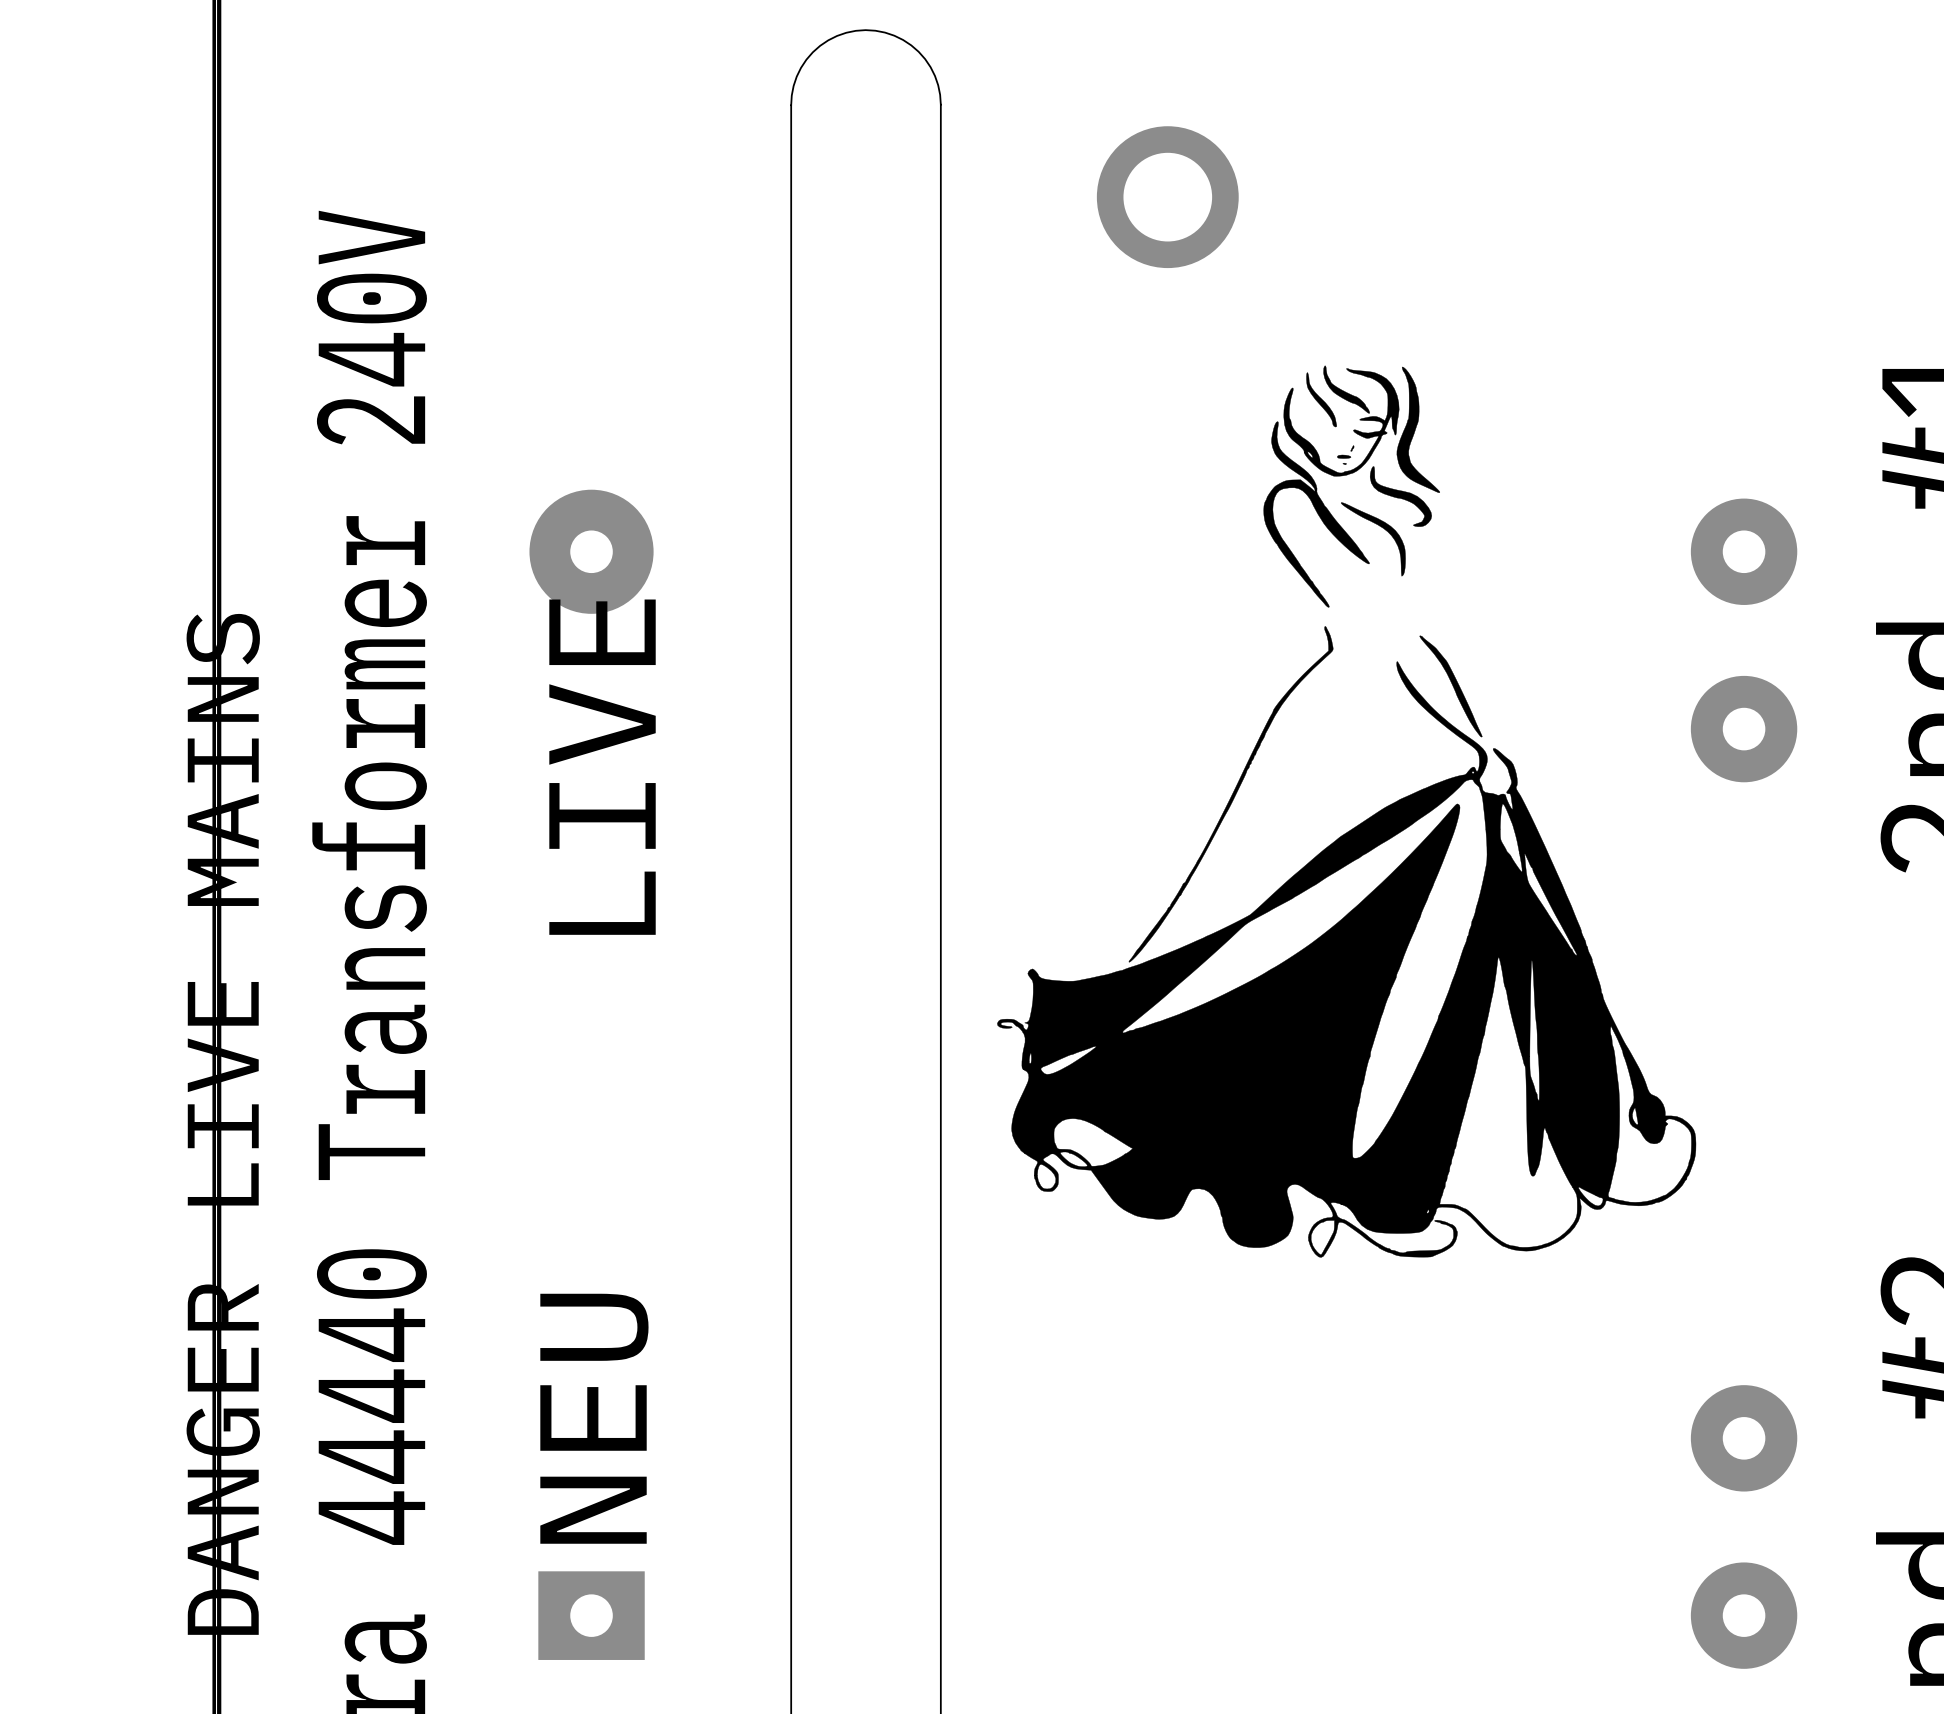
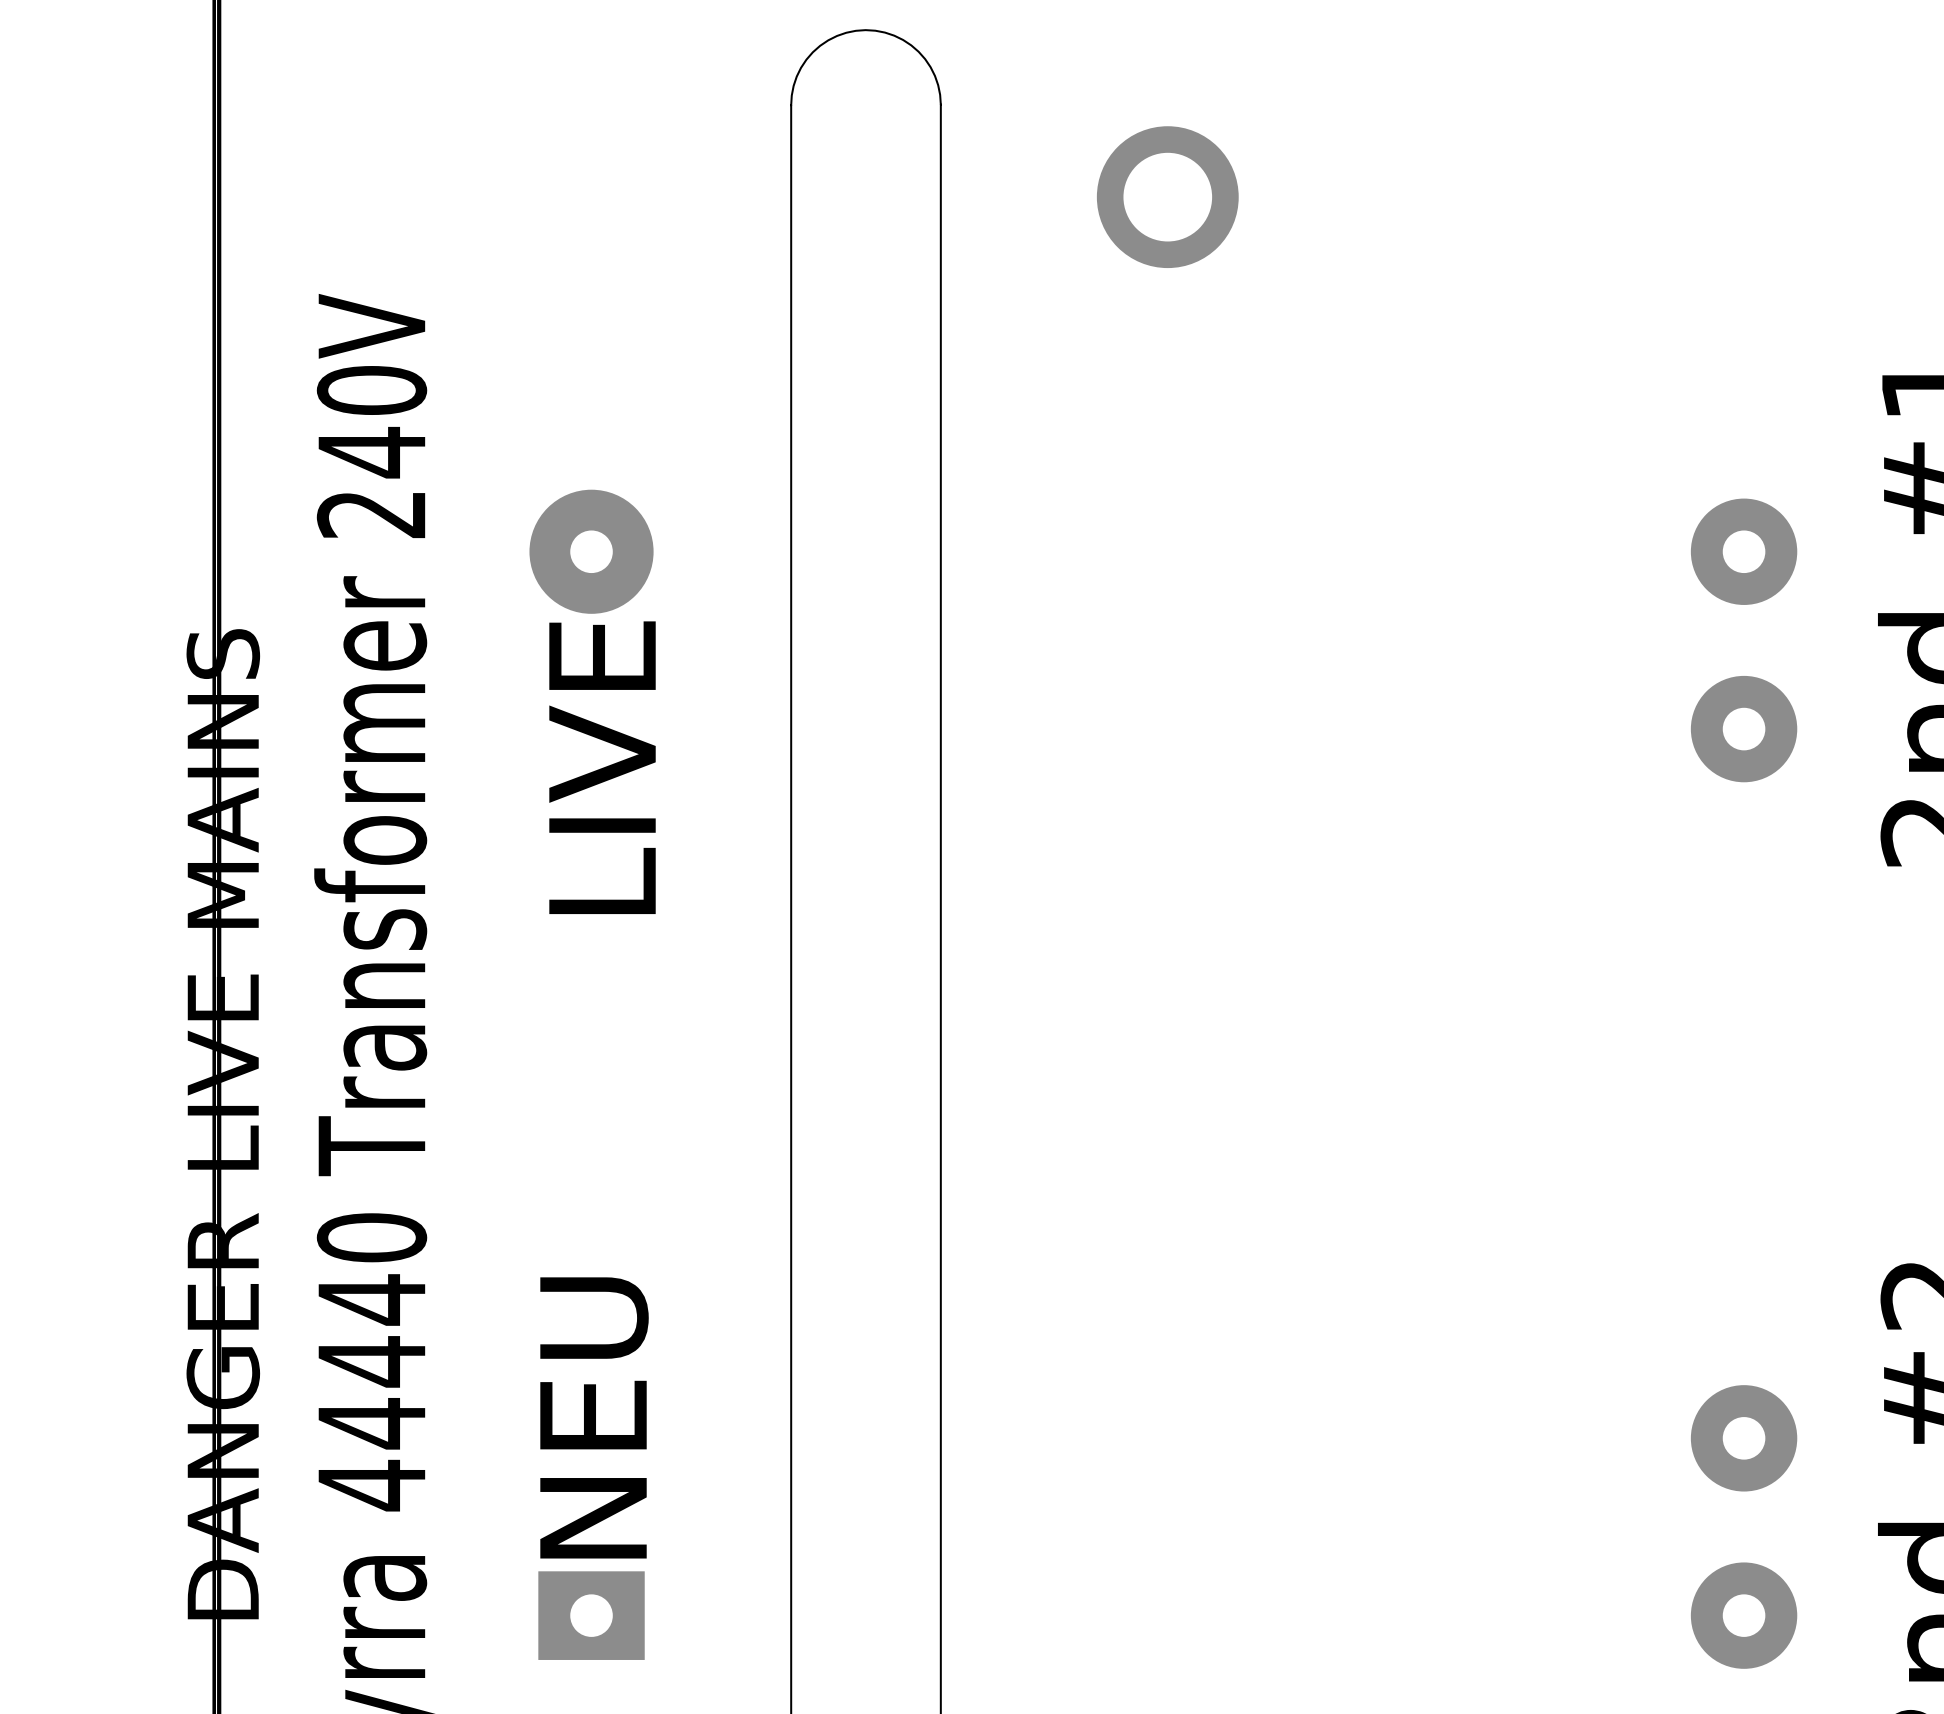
drawing: [997, 365, 1697, 1258] -> none

